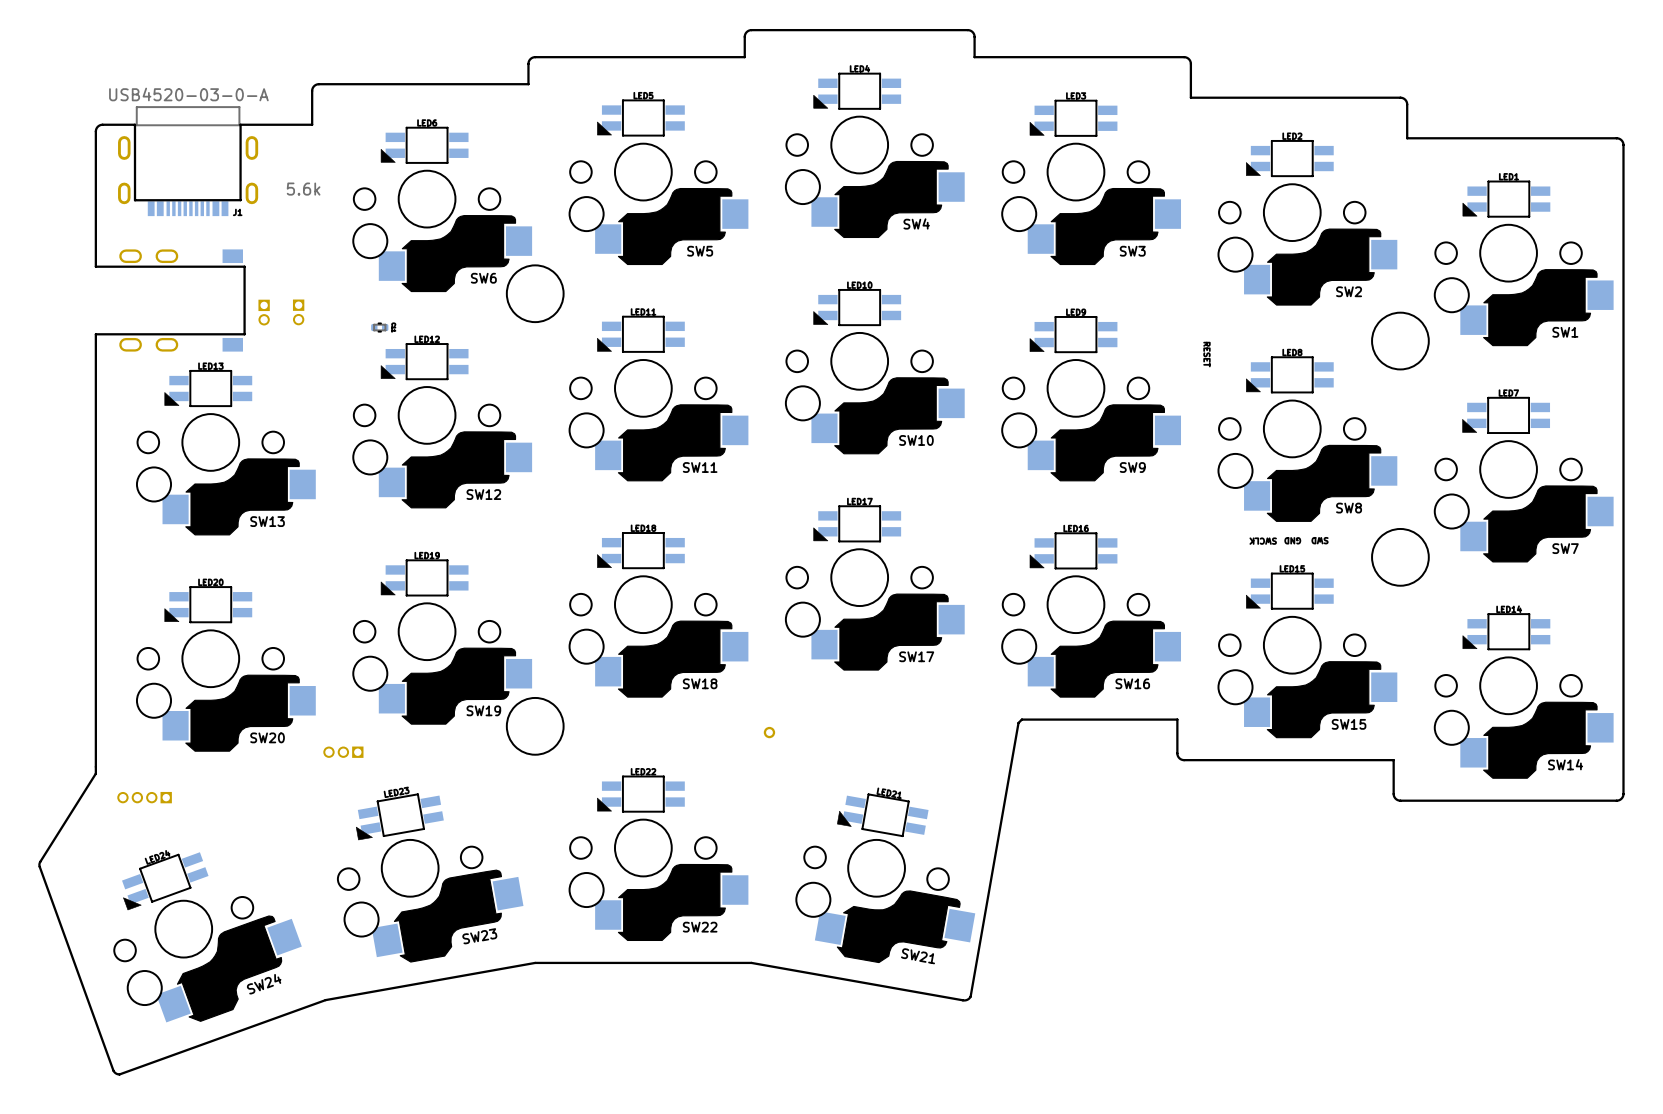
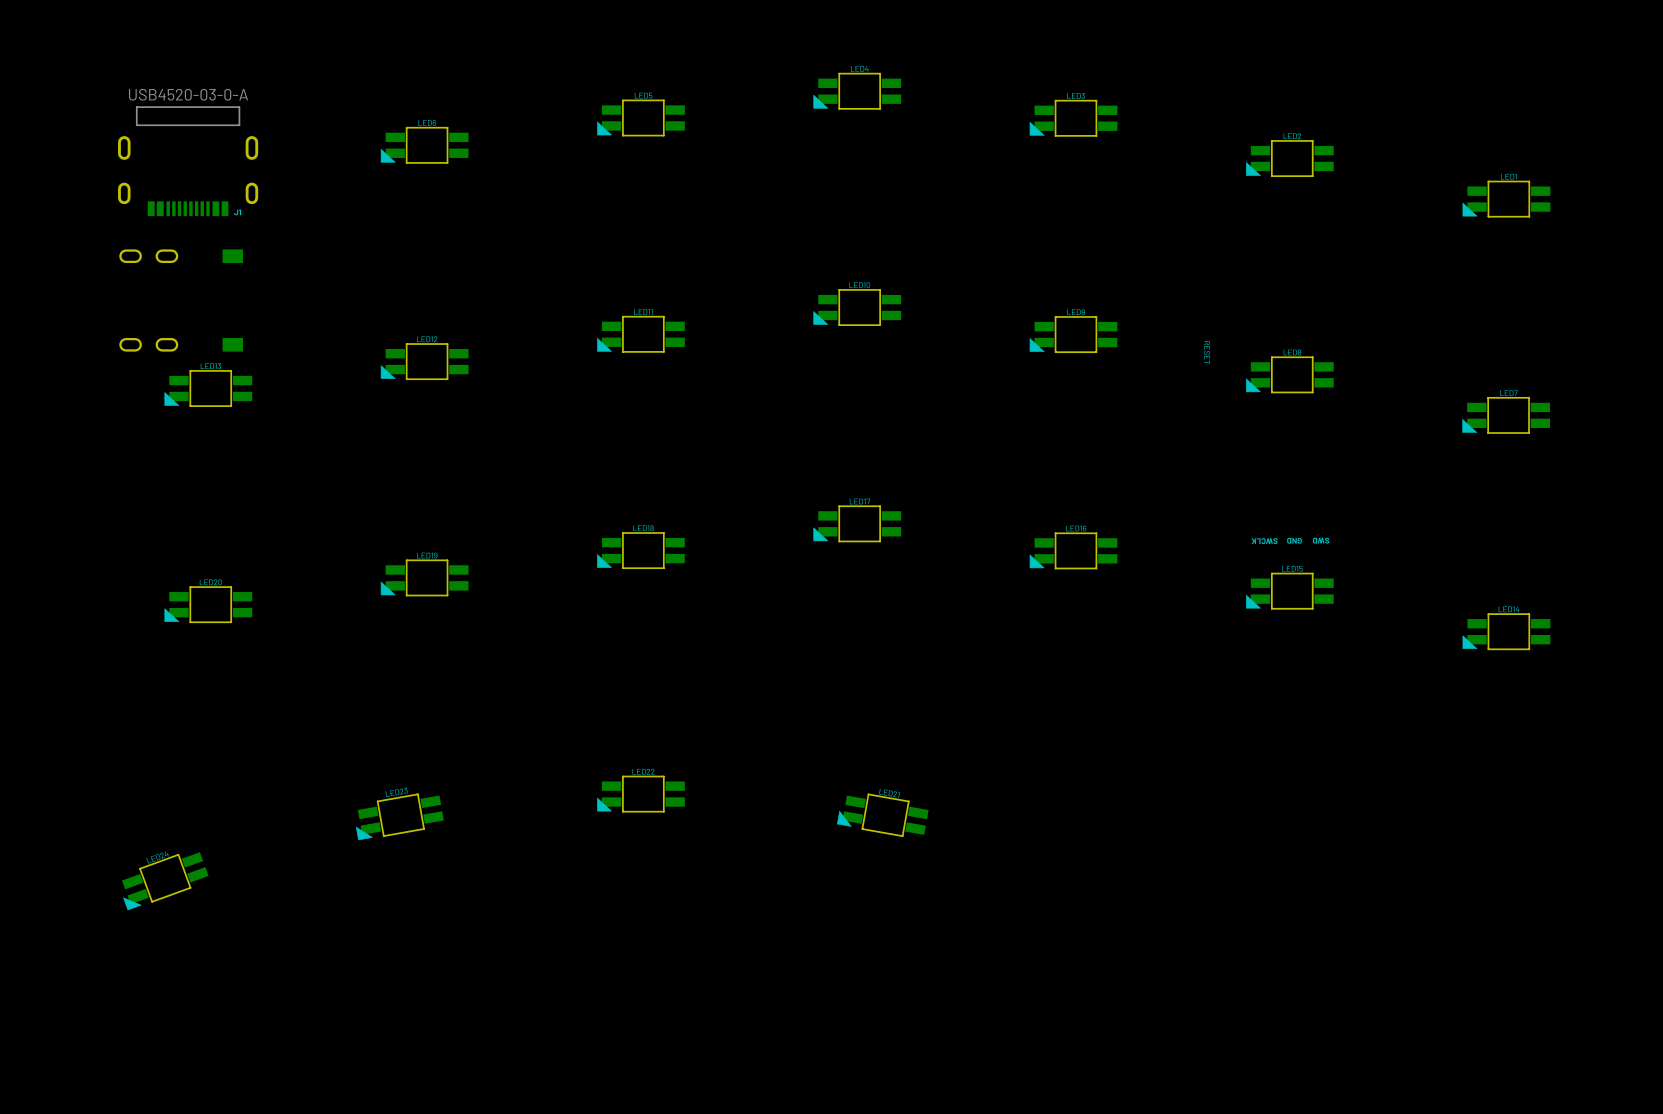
board edge: (967, 30) (750, 30) (744, 35) (744, 57) (534, 57) (528, 62) (528, 84) (317, 84) (312, 90) (312, 124) (240, 124) (240, 200) (135, 200) (134, 124) (101, 124) (97, 127) (95, 266) (244, 266) (244, 334) (95, 334) (95, 773) (39, 864) (115, 1073) (119, 1074) (325, 1000) (535, 962) (751, 962) (967, 999) (970, 996) (1018, 722) (1021, 719) (1177, 719) (1177, 754) (1183, 760) (1393, 760) (1393, 794) (1399, 800) (1616, 800) (1622, 798) (1622, 140) (1616, 138) (1407, 138) (1407, 103) (1401, 97) (1190, 97) (1190, 63) (1186, 57) (974, 57) (974, 35) (967, 30) -> none
SW4: (875, 156) -> none
SW5: (658, 183) -> none
SW3: (1091, 183) -> none
part: 5.6k (303, 189) -> none
SW6: (442, 210) -> none
SW2: (1307, 224) -> none
round board edge: [506, 264, 565, 323] -> none
SW1: (1524, 264) -> none
part: (264, 312) -> none
part: (298, 312) -> none
round board edge: [1371, 312, 1430, 371] -> none
part: (379, 327) -> none
SW10: (875, 372) -> none
SW11: (658, 399) -> none
SW9: (1091, 399) -> none
SW12: (442, 426) -> none
SW8: (1307, 440) -> none
SW13: (226, 454) -> none
SW7: (1524, 481) -> none
round board edge: [1371, 528, 1430, 587] -> none
SW17: (875, 589) -> none
SW18: (658, 616) -> none
SW16: (1091, 616) -> none
SW19: (442, 643) -> none
SW15: (1307, 656) -> none
SW20: (226, 670) -> none
round board edge: [506, 697, 565, 756] -> none
SW14: (1524, 697) -> none
part: (769, 732) -> none
part: (343, 752) -> none
part: (144, 797) -> none
SW22: (658, 859) -> none
SW23: (429, 876) -> none
SW21: (885, 876) -> none
SW24: (201, 933) -> none

